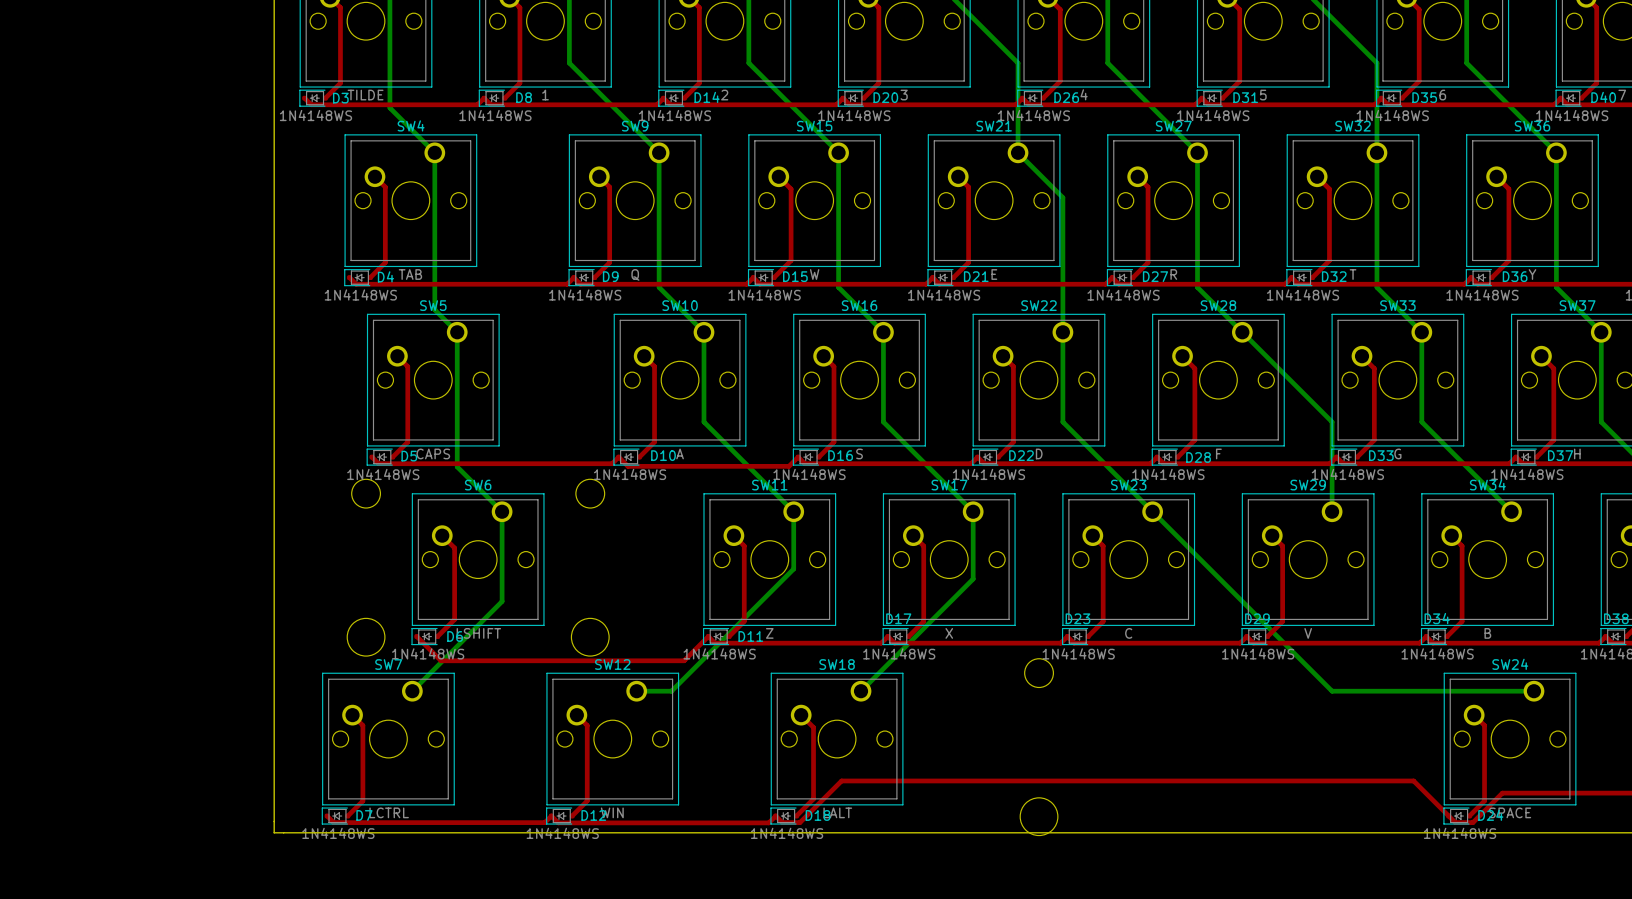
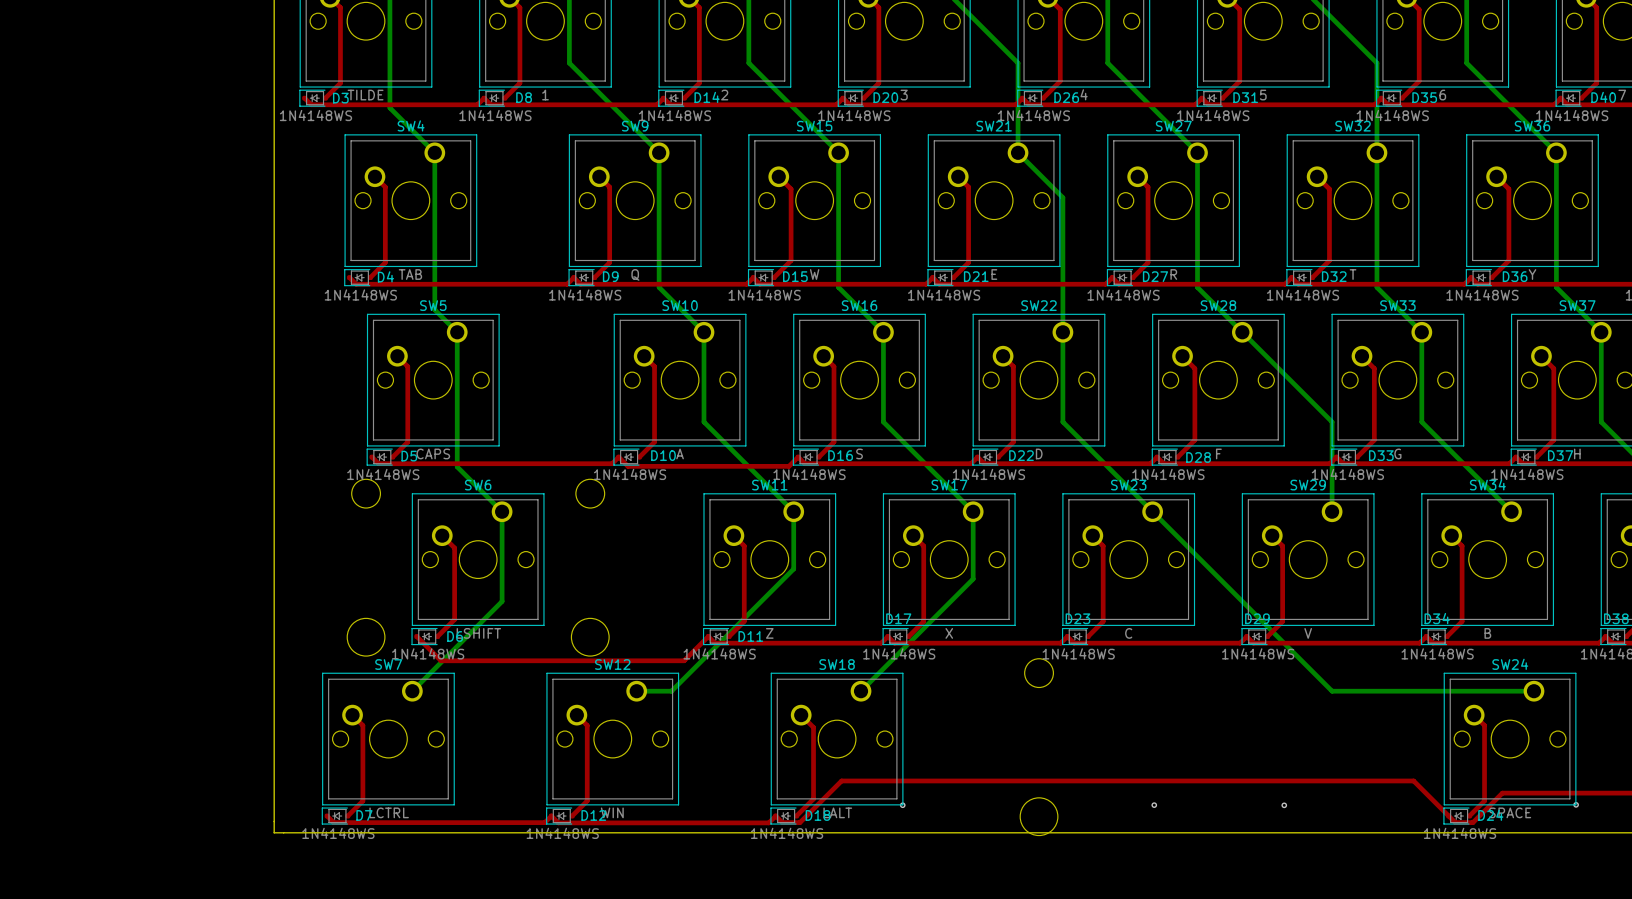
via: none -> (1576, 804)
via: none -> (902, 805)
via: none -> (1154, 805)
via: none -> (1284, 805)

